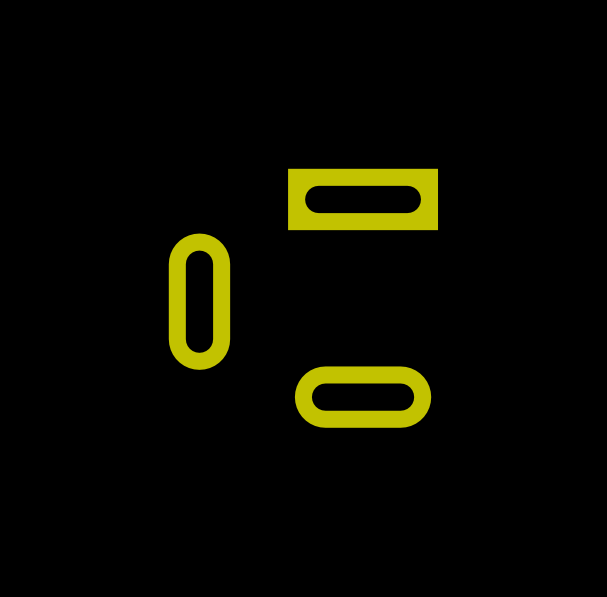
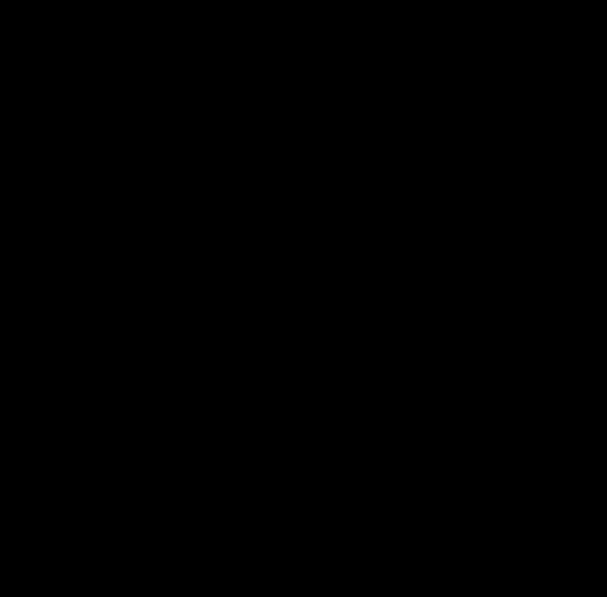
part: (303, 298) -> none

